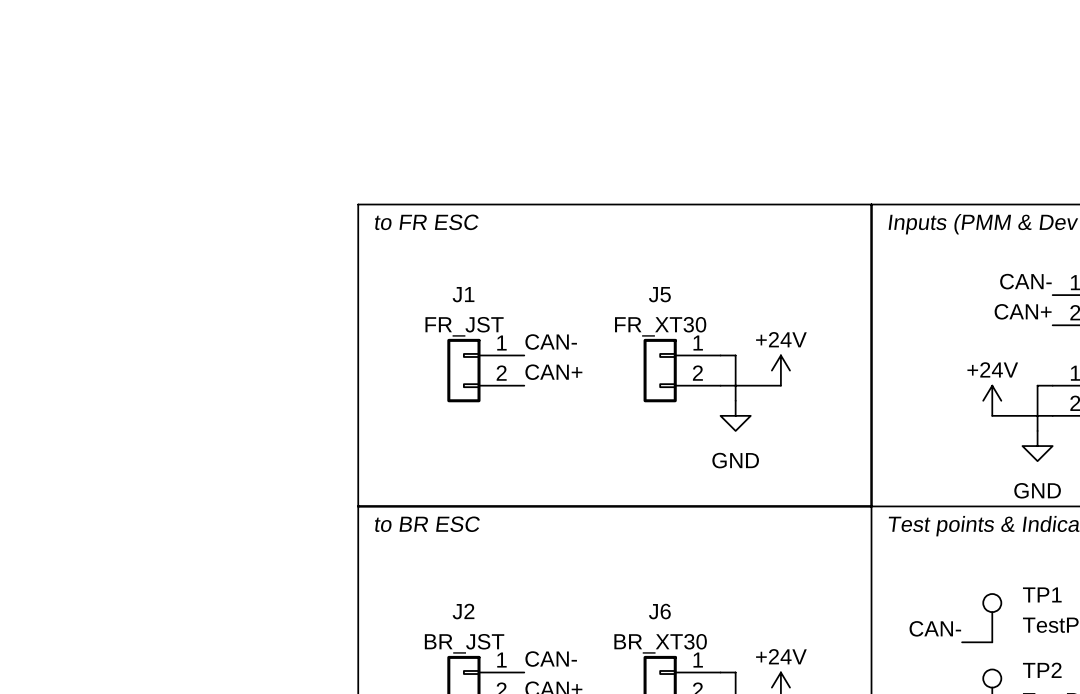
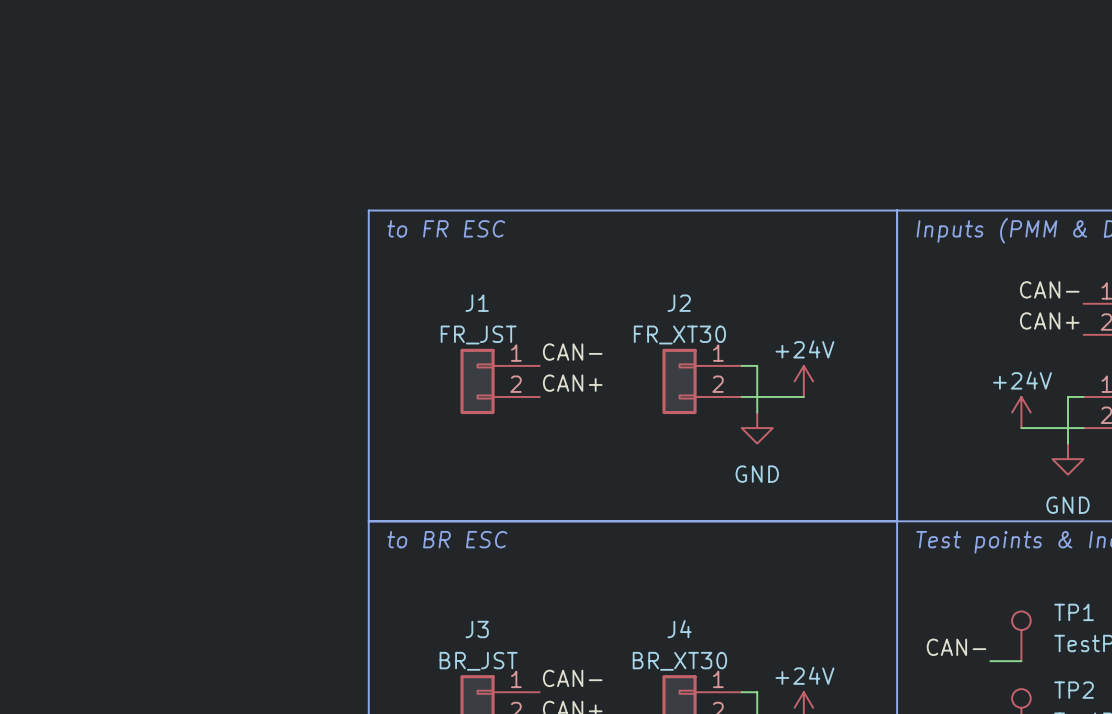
J5 name: J5 (659, 294) -> J2 (679, 303)
J2 name: J2 (463, 611) -> J3 (477, 629)
J6 name: J6 (659, 611) -> J4 (679, 629)

